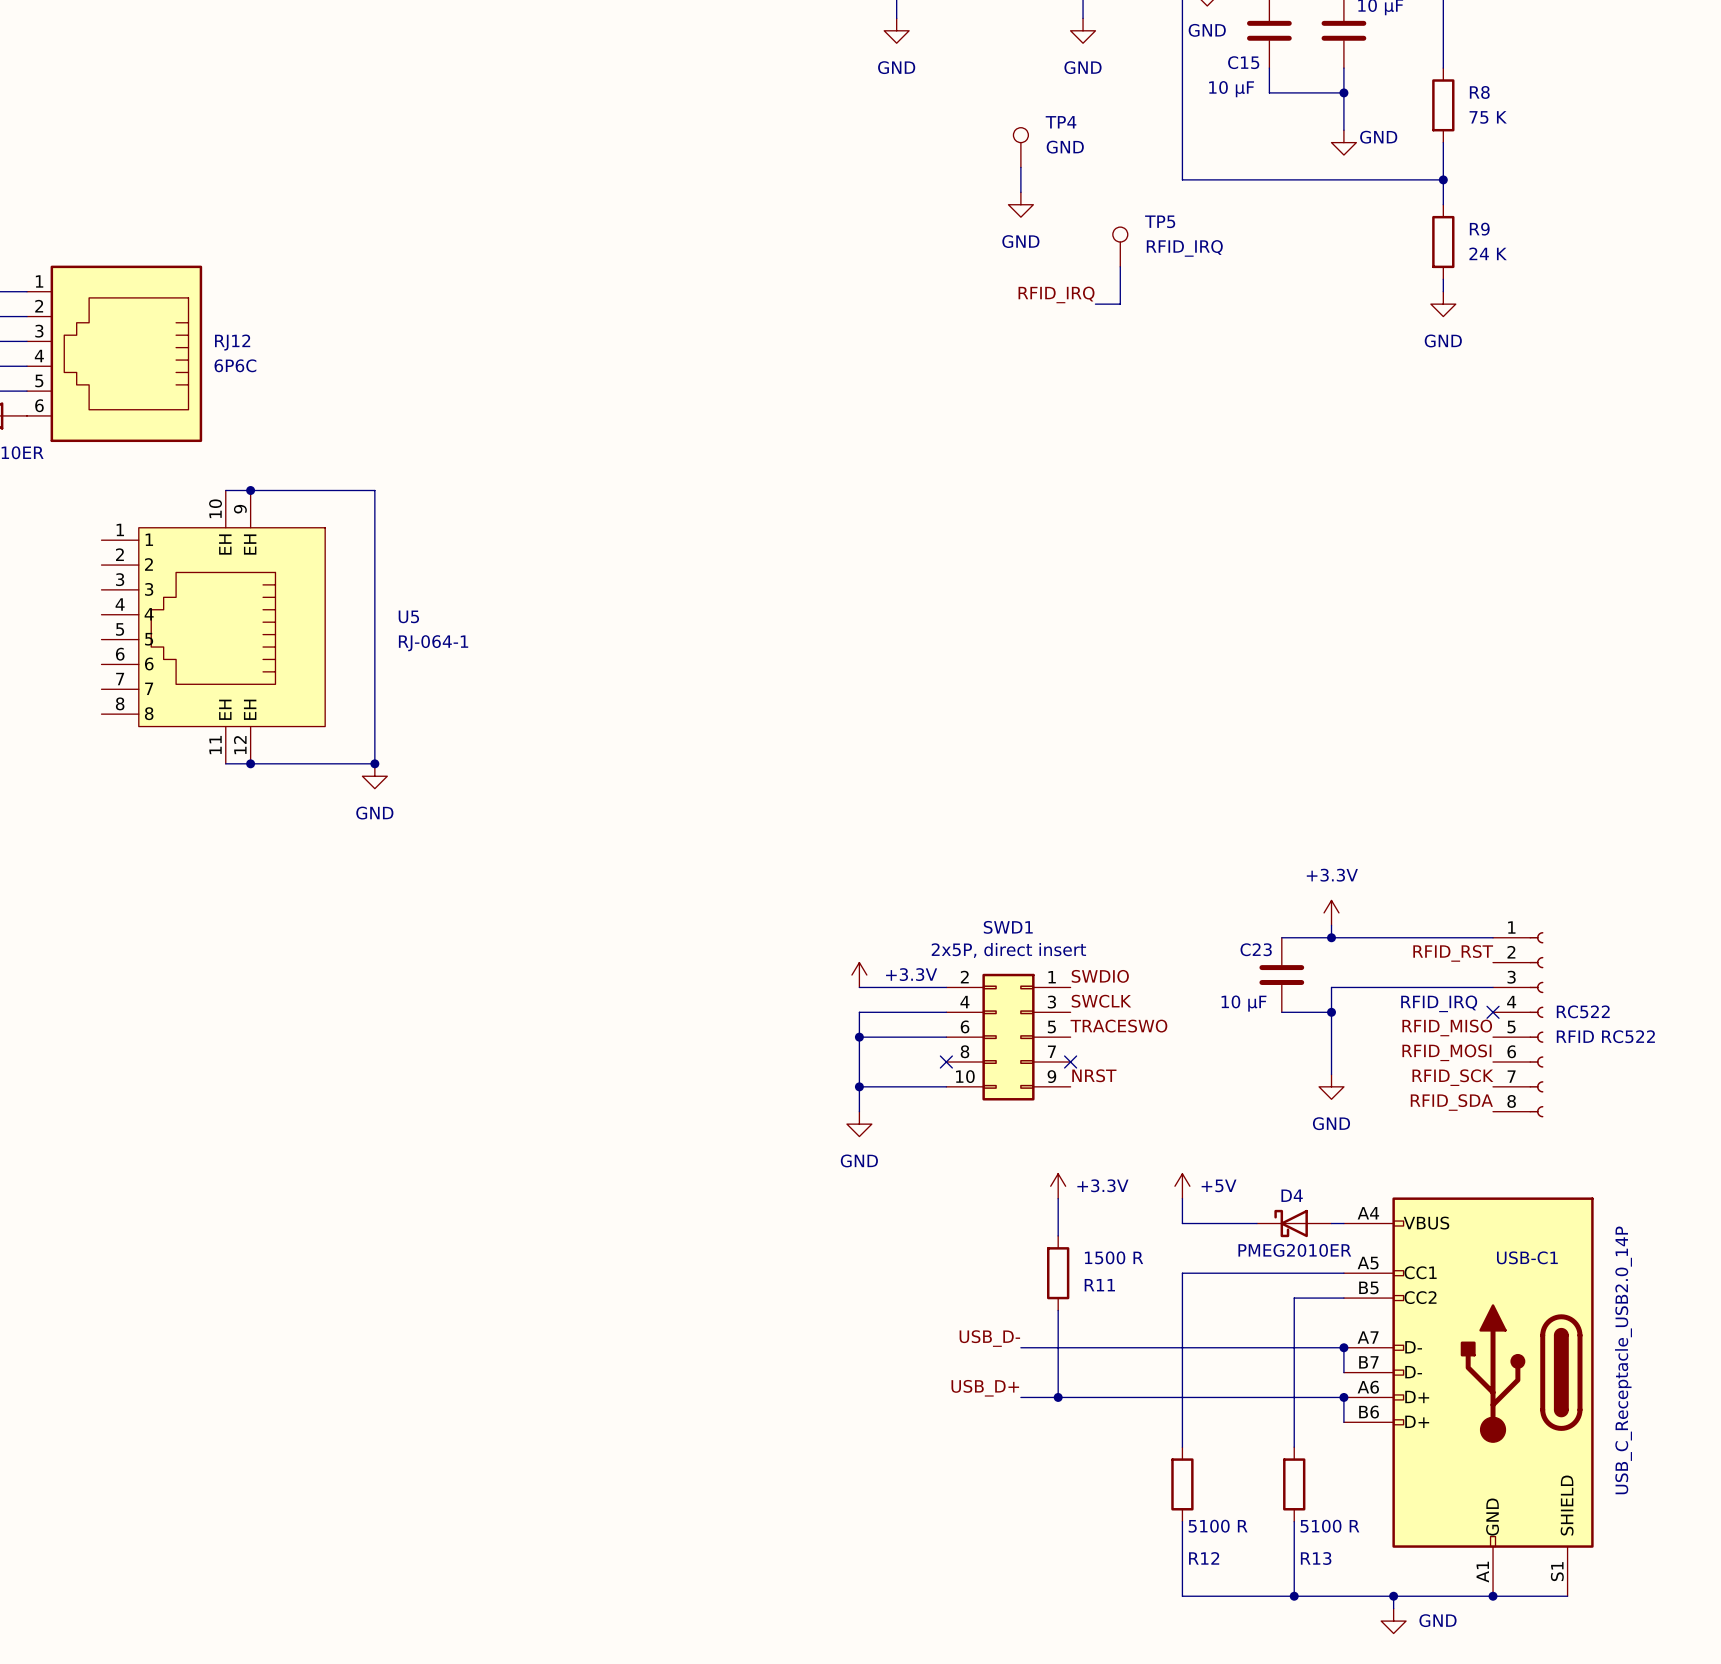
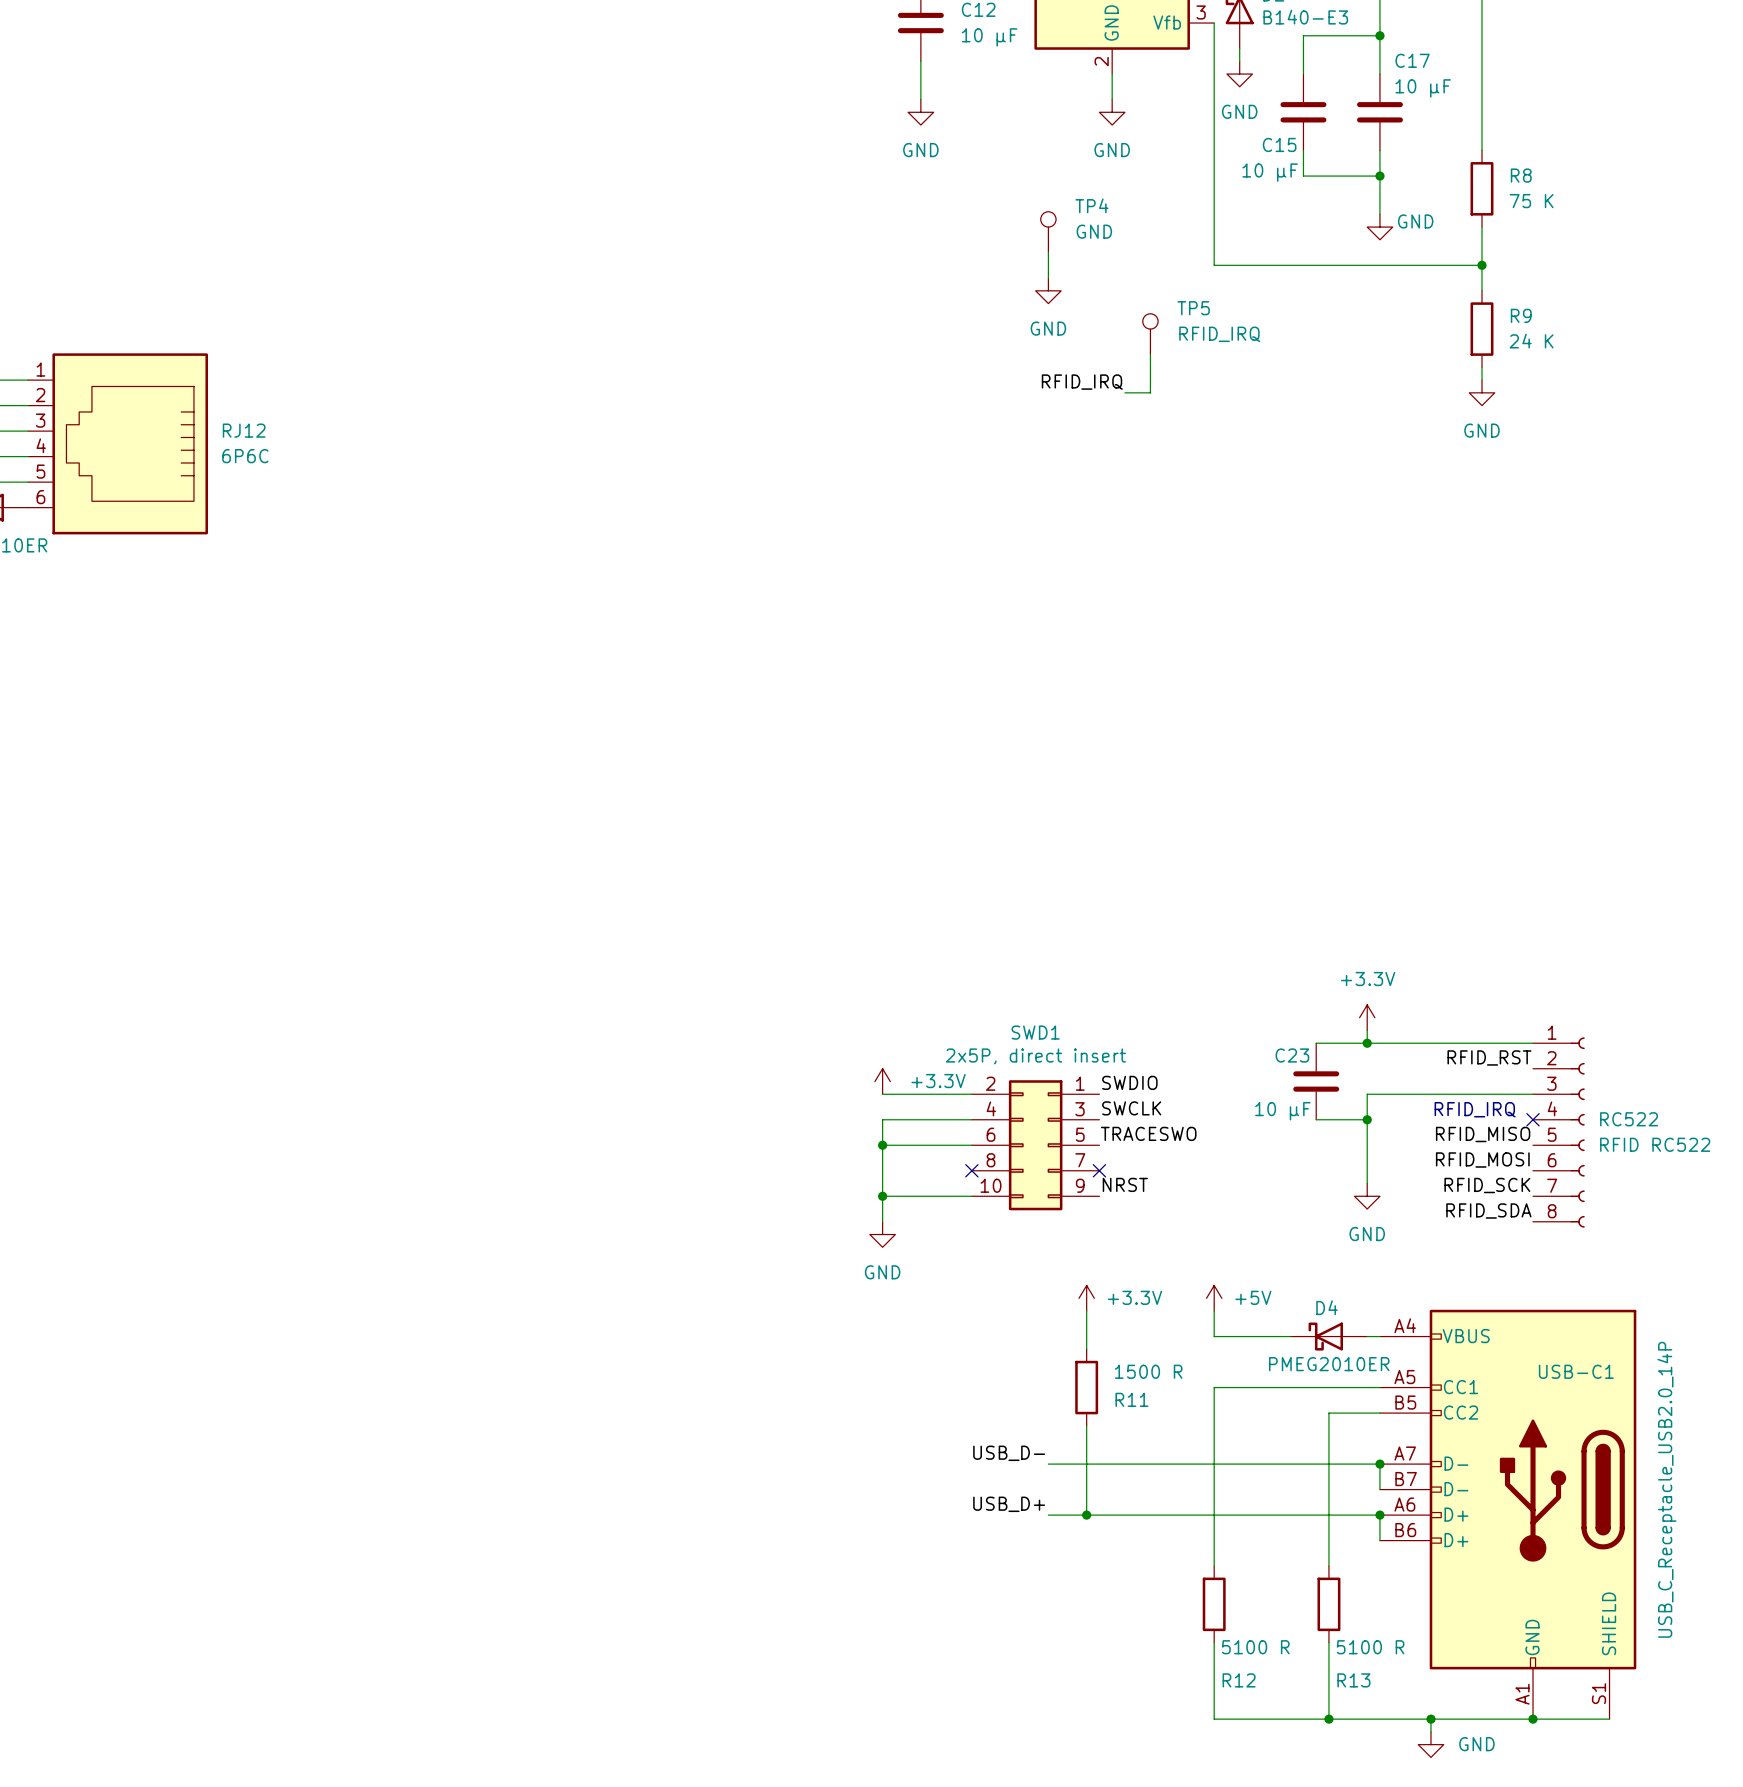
wire: (225, 490) (374, 490) (374, 763) (225, 763) -> none
junction: (250, 490) -> none
U5: RJ-064-1 (213, 627) -> none
junction: (250, 763) -> none
junction: (374, 763) -> none
power symbol: GND (374, 776) -> none

